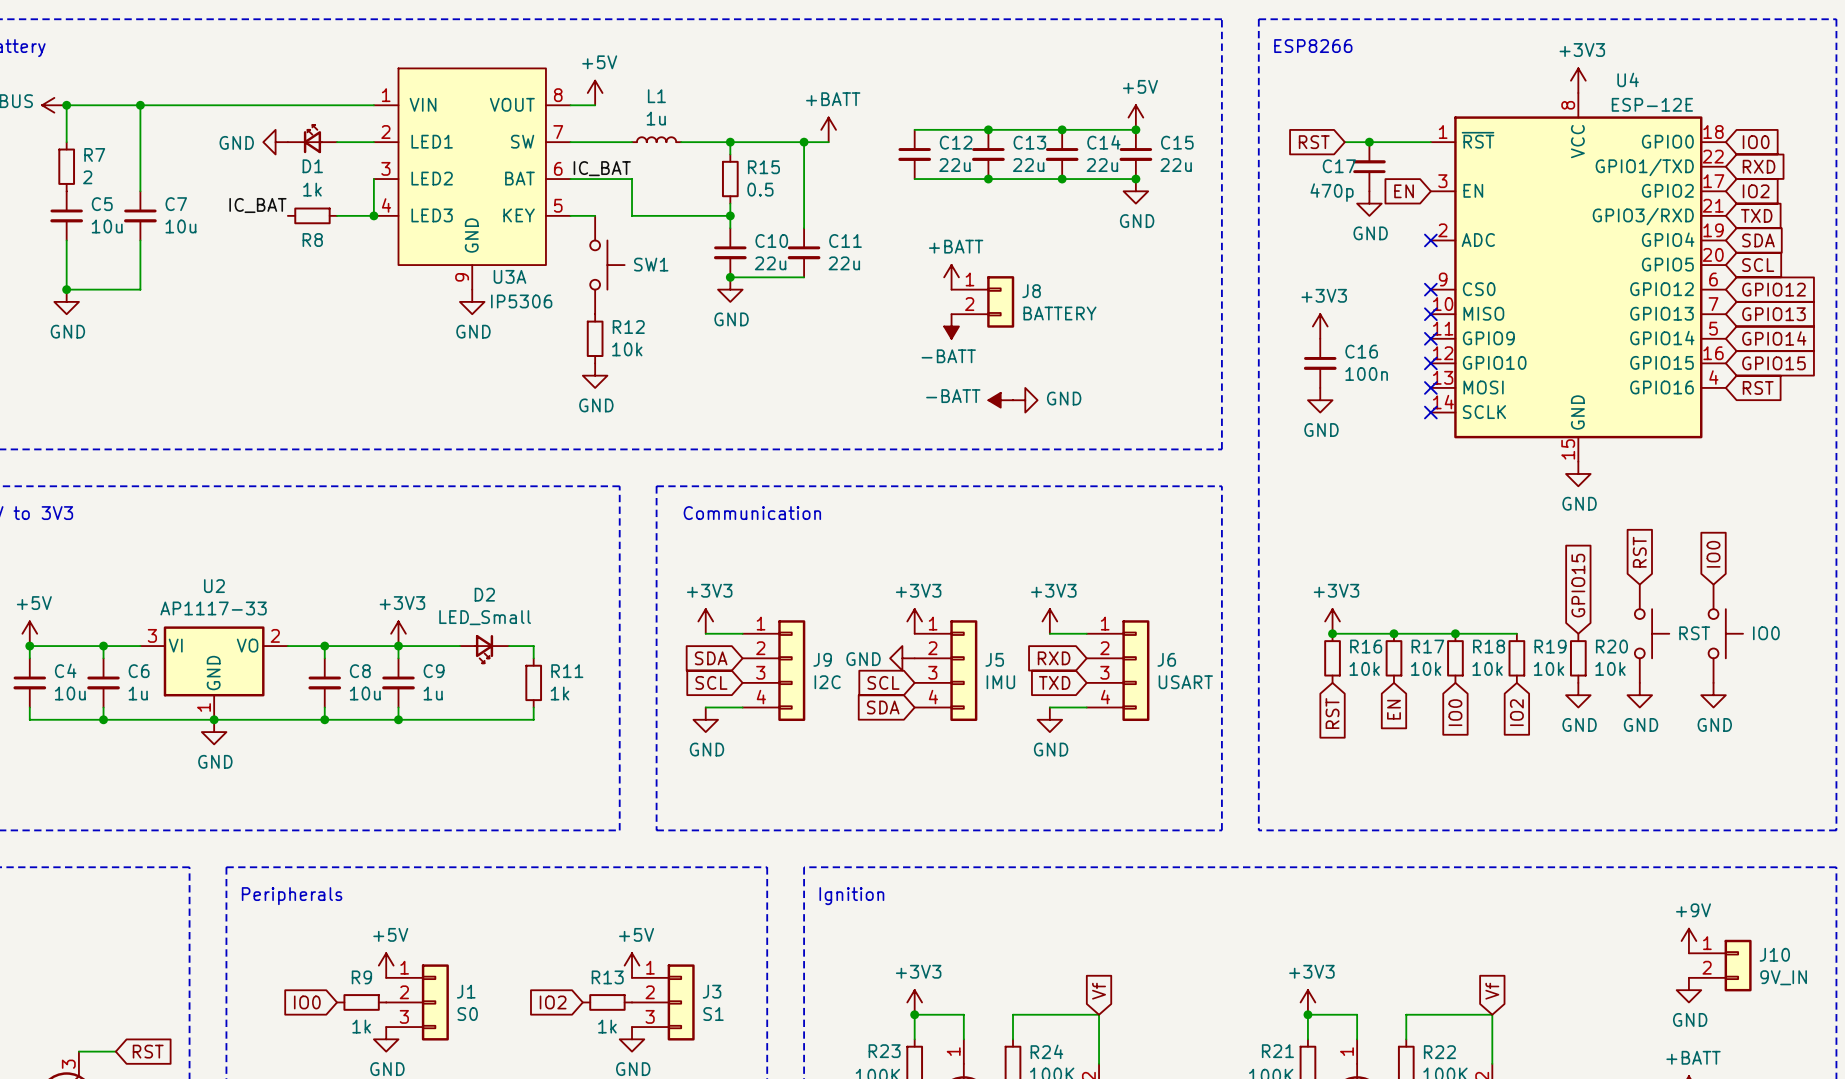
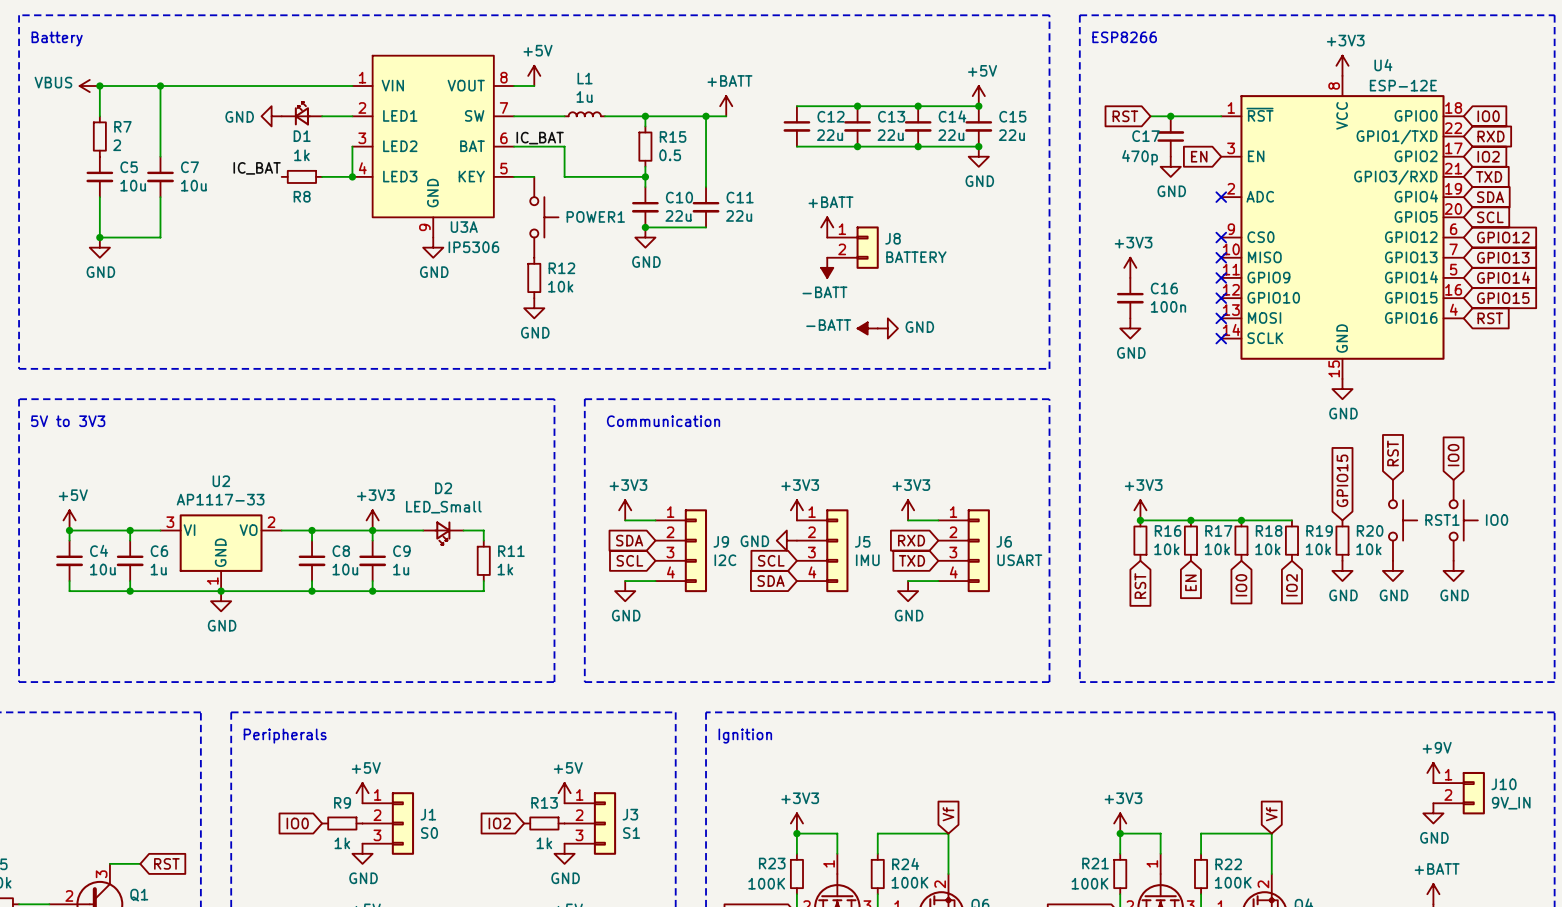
SW1 name: SW1 (651, 264) -> POWER1 (595, 216)
RST name: RST (1694, 633) -> RST1 (1442, 520)

